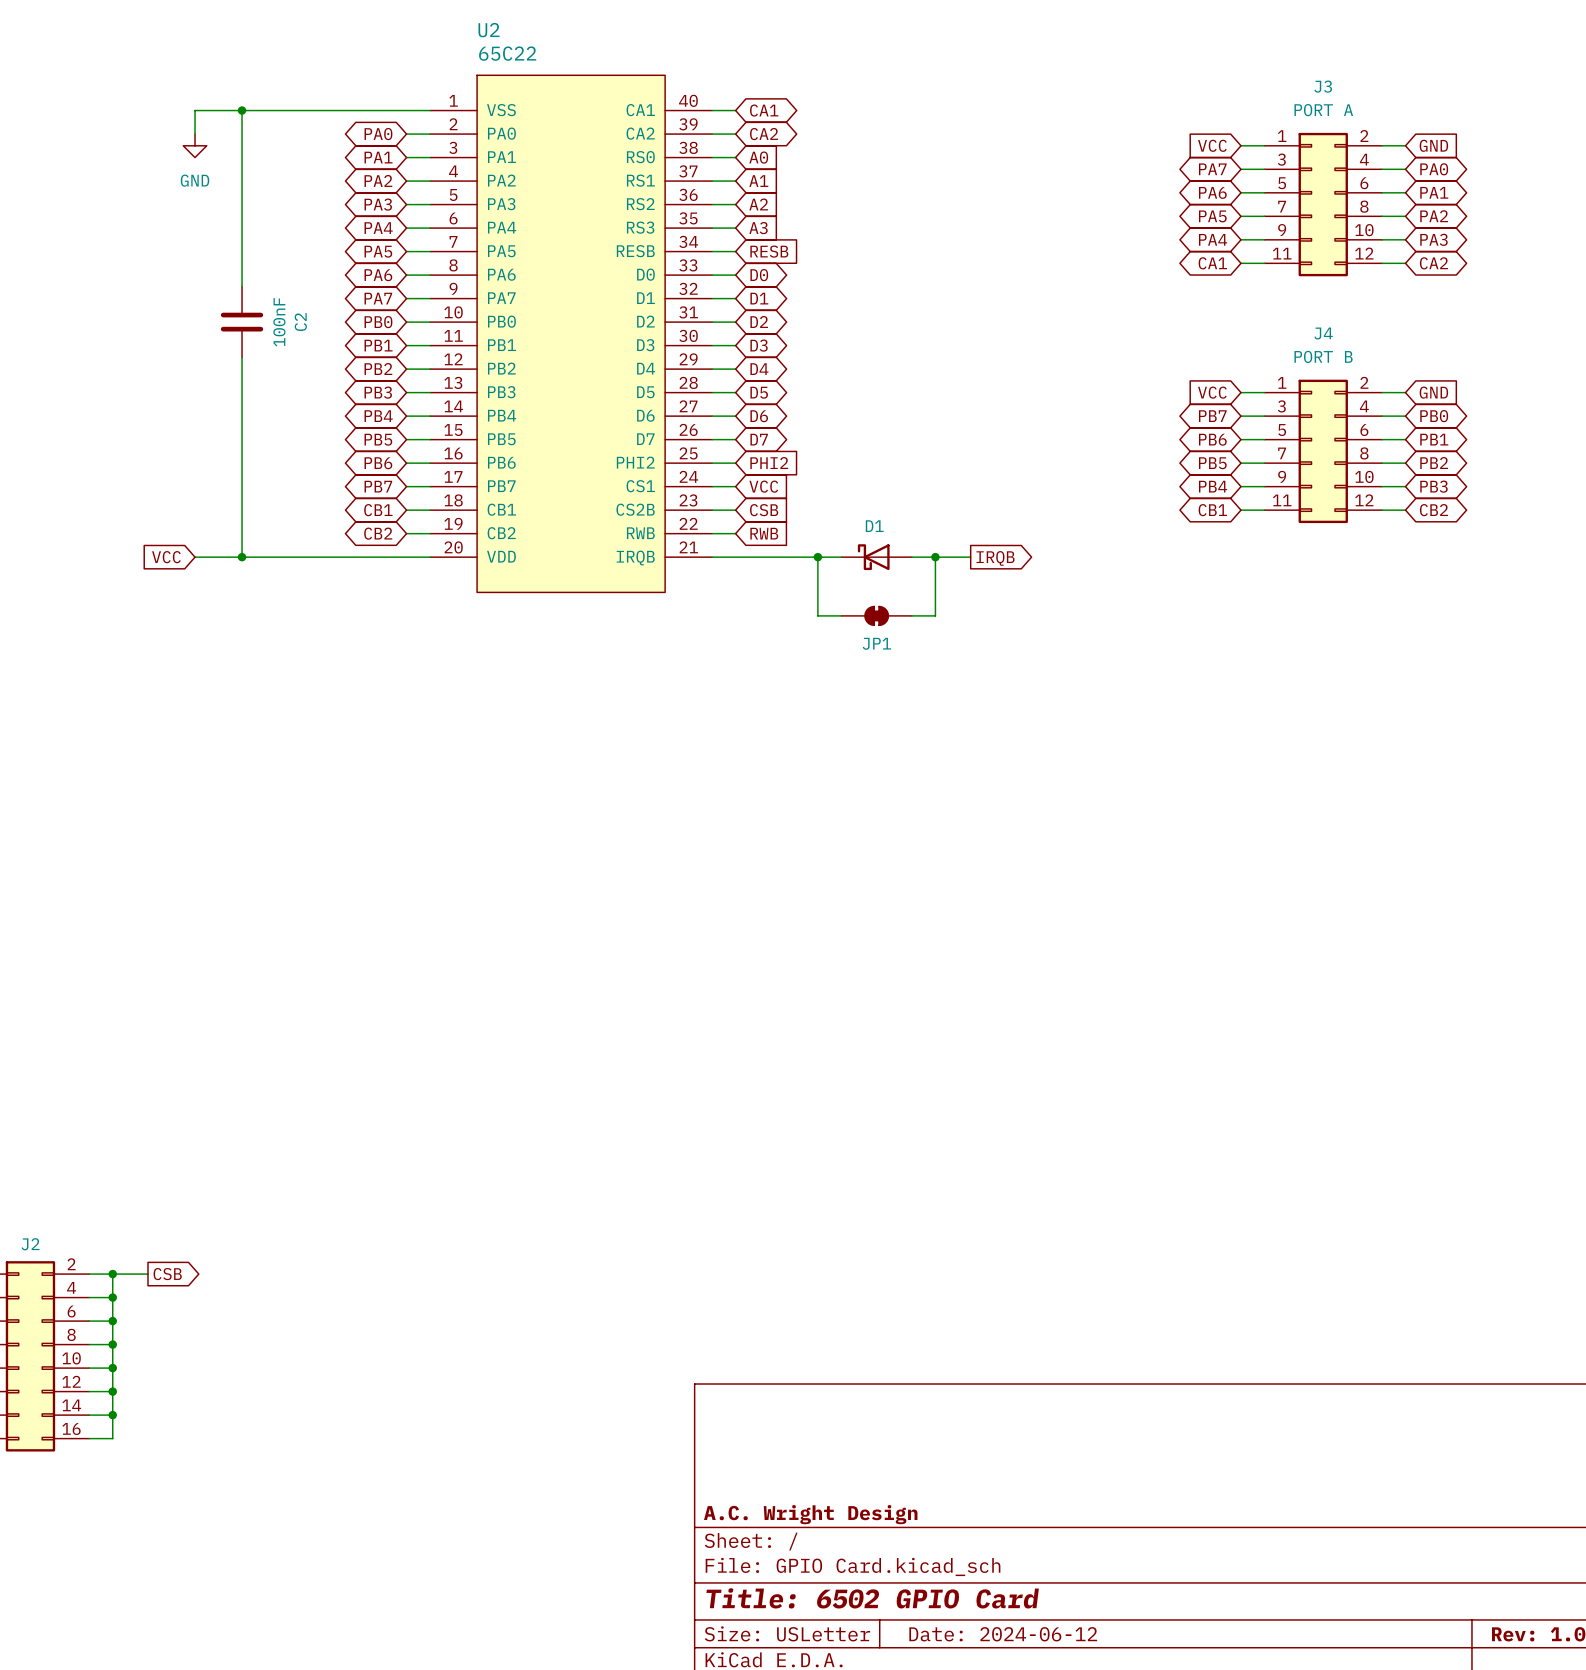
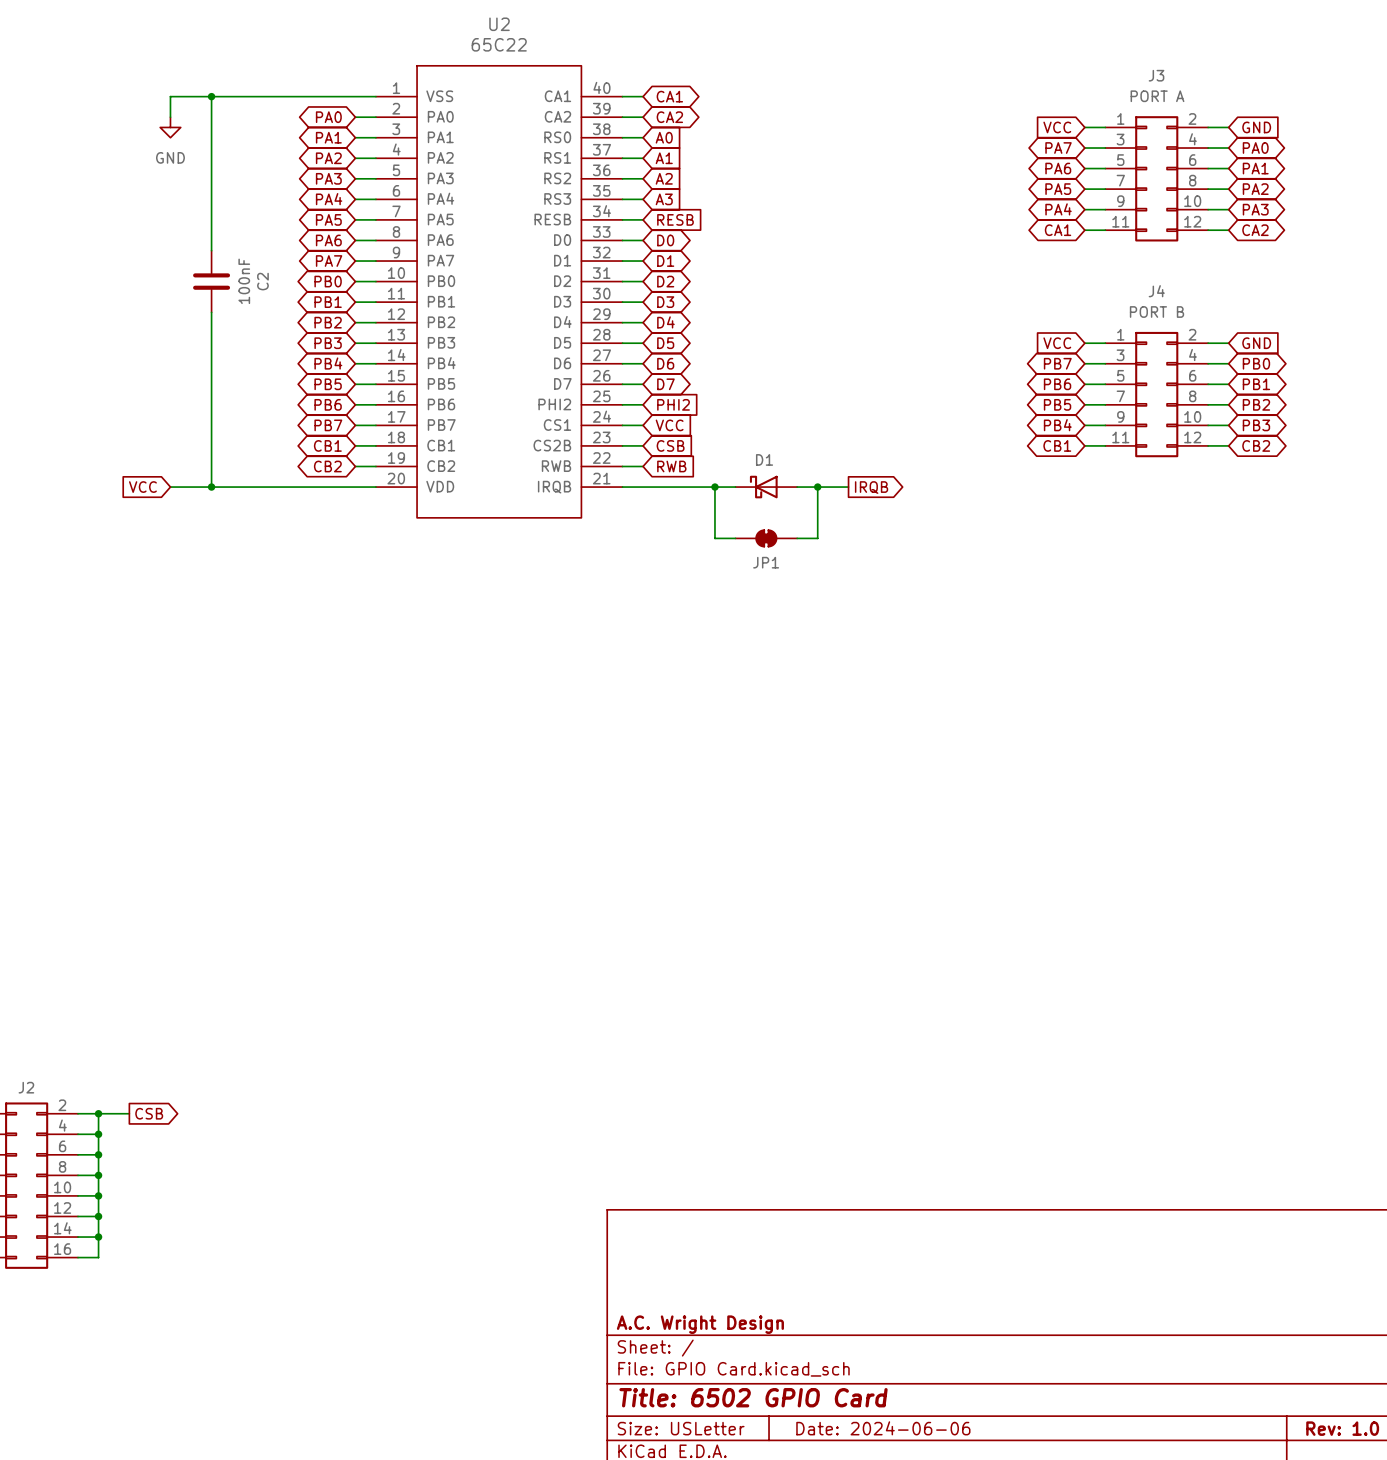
U2 name position: U2 (488, 30) -> U2 (499, 24)
U2 value position: 65C22 (507, 53) -> 65C22 (499, 44)
title block: Date: 2024-06-12 (1003, 1634) -> Date: 2024-06-06 (883, 1428)

